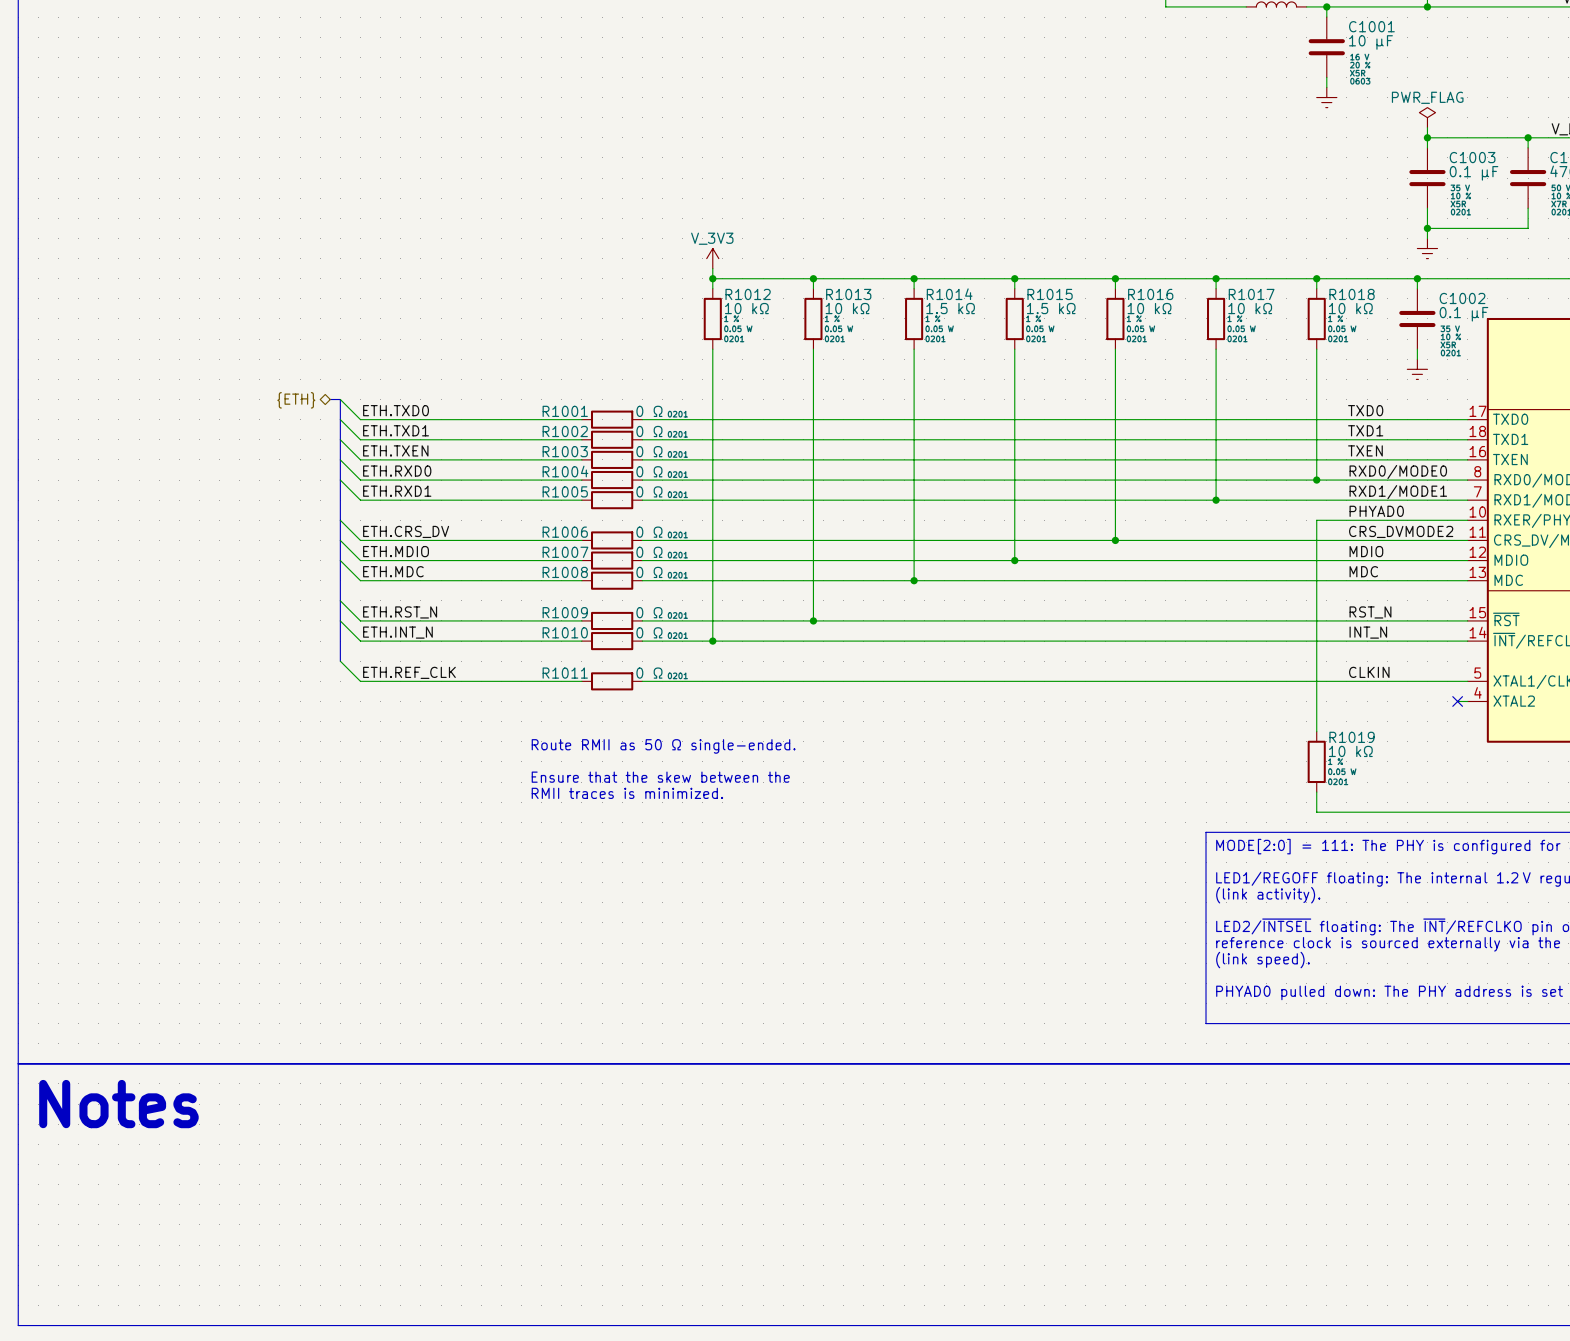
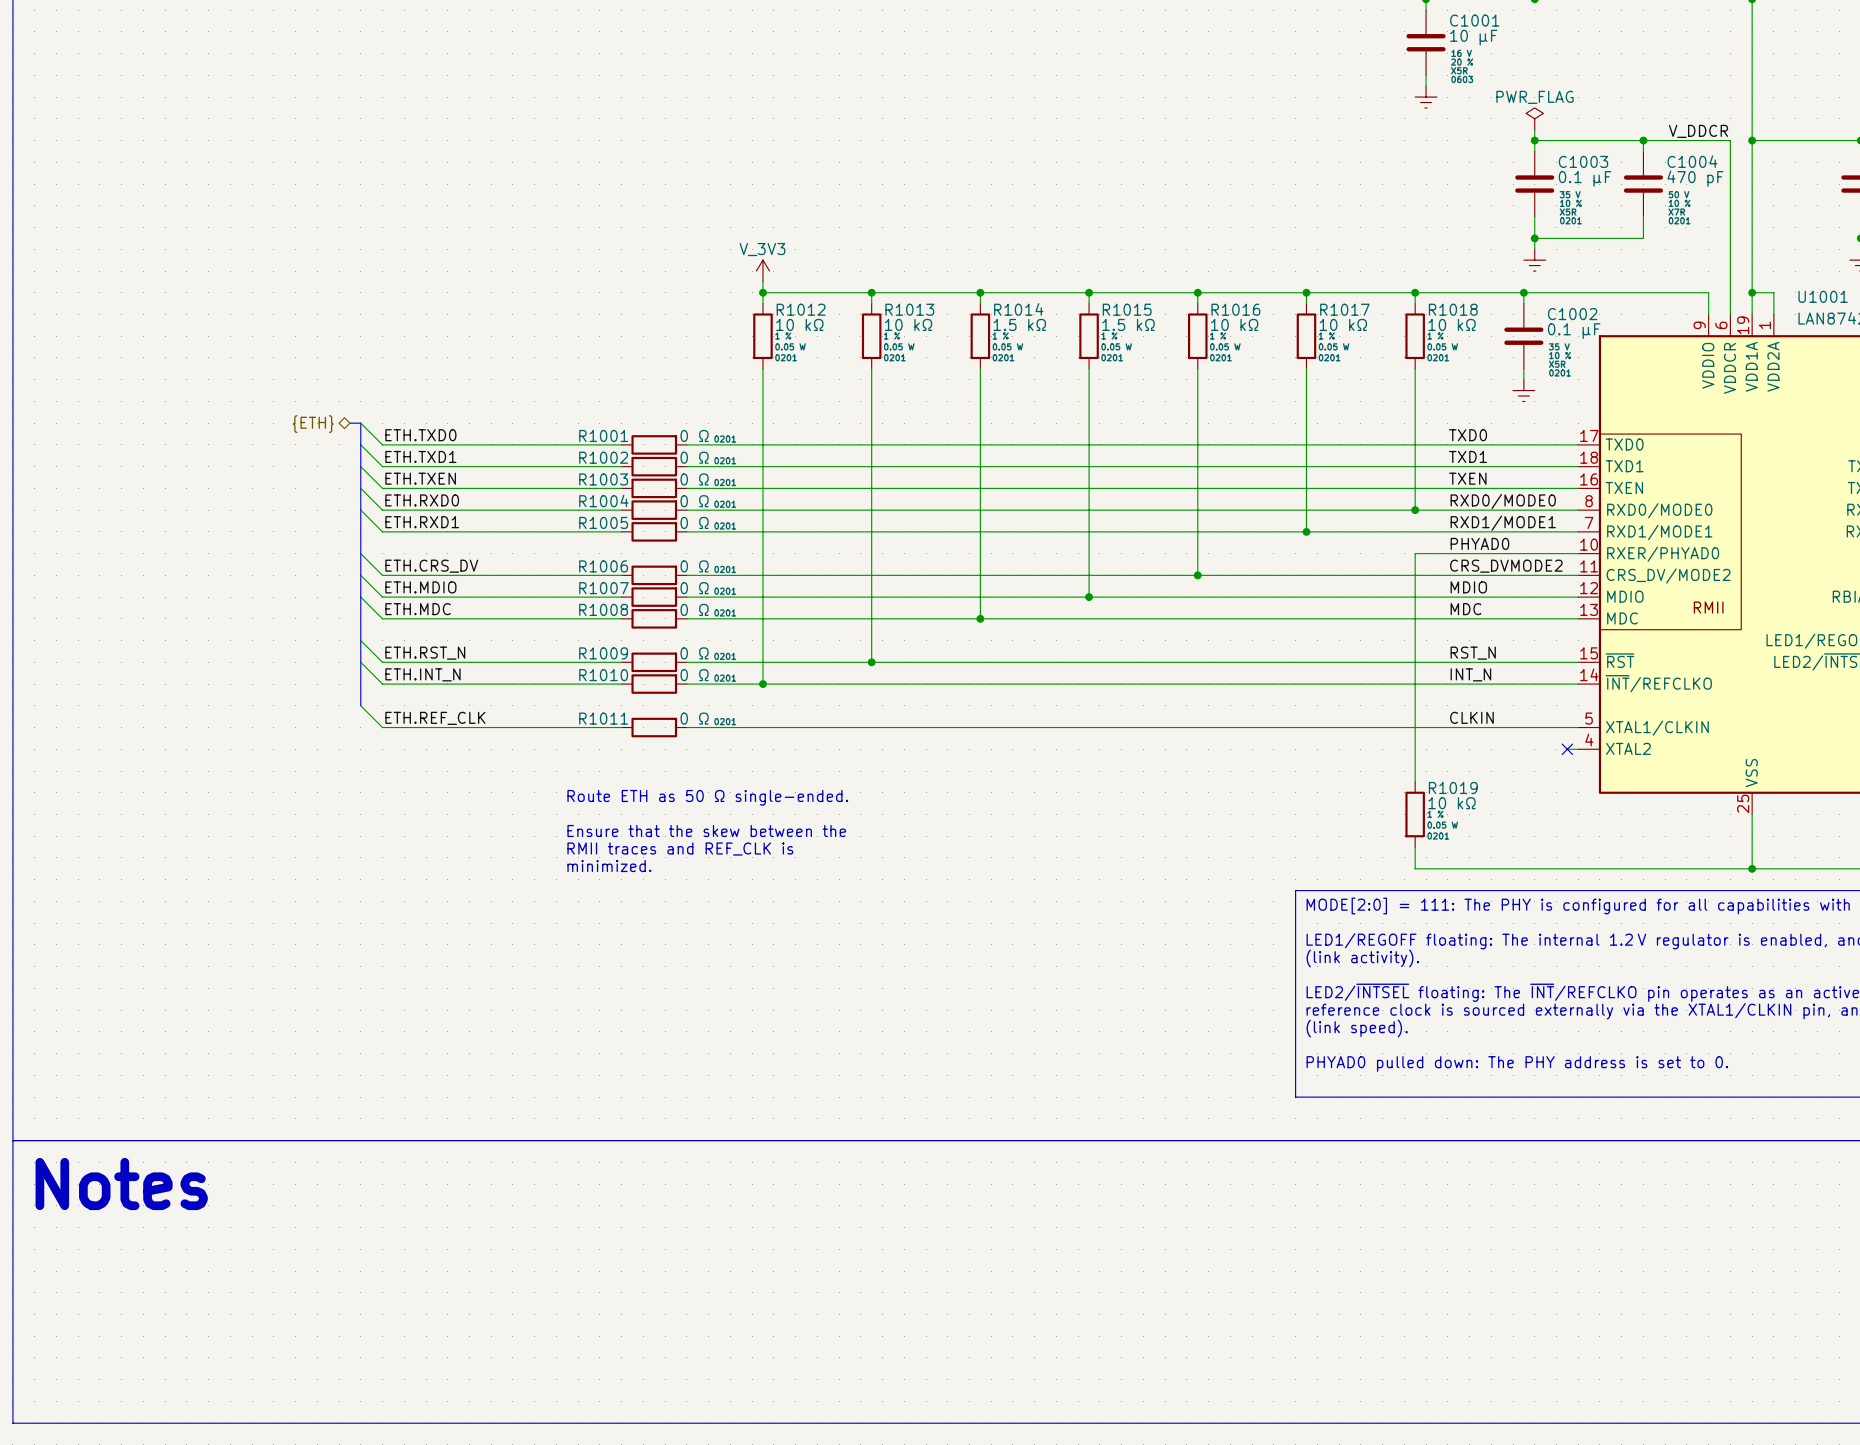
text: Route RMII as 50 Ω single-ended. (663, 746) -> Route ETH as 50 Ω single-ended. (707, 797)
text: RMII traces is minimized. (627, 793) -> RMII traces and REF_CLK is (680, 849)
text: none -> minimized. (609, 865)

